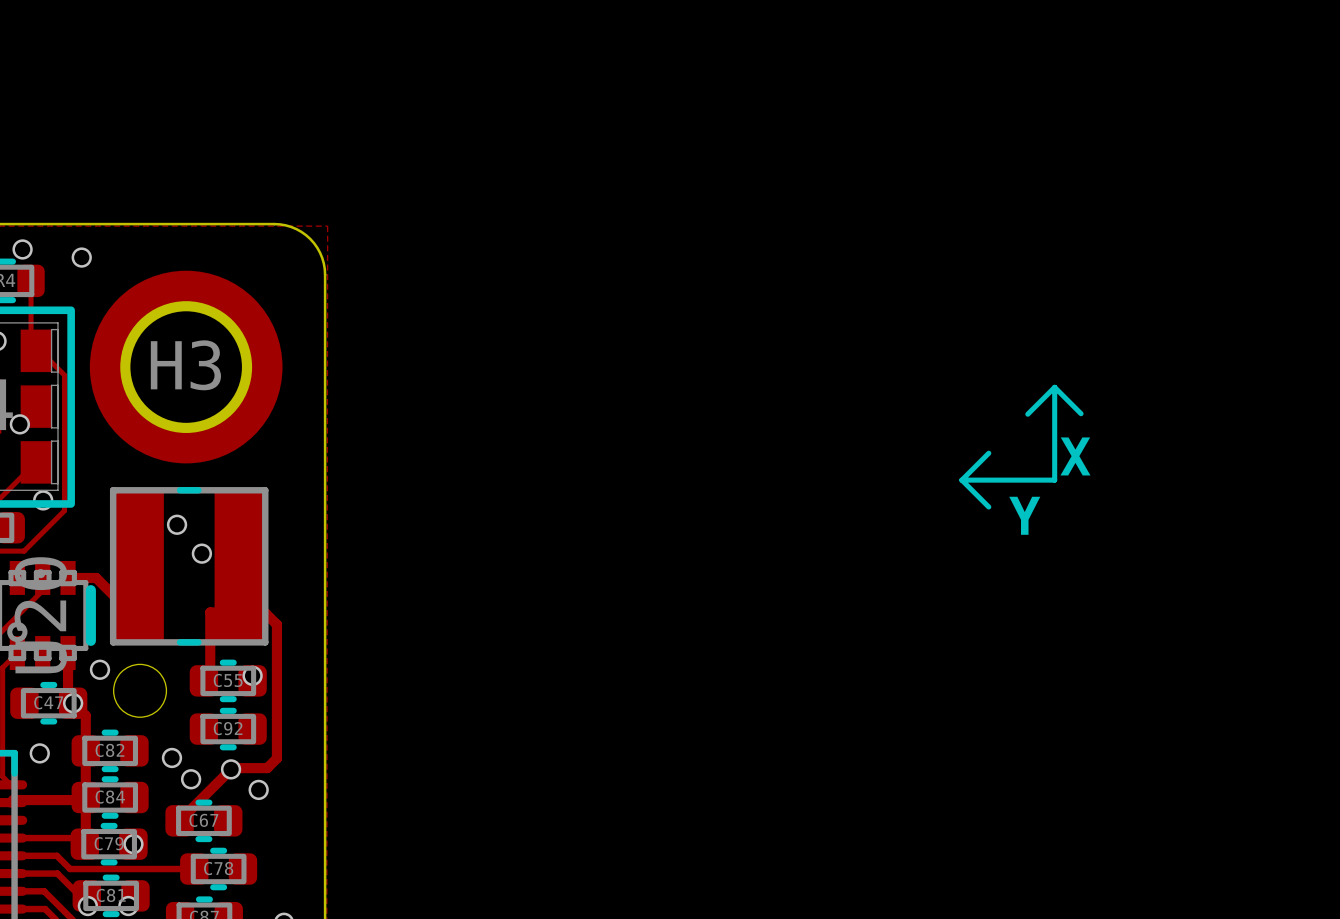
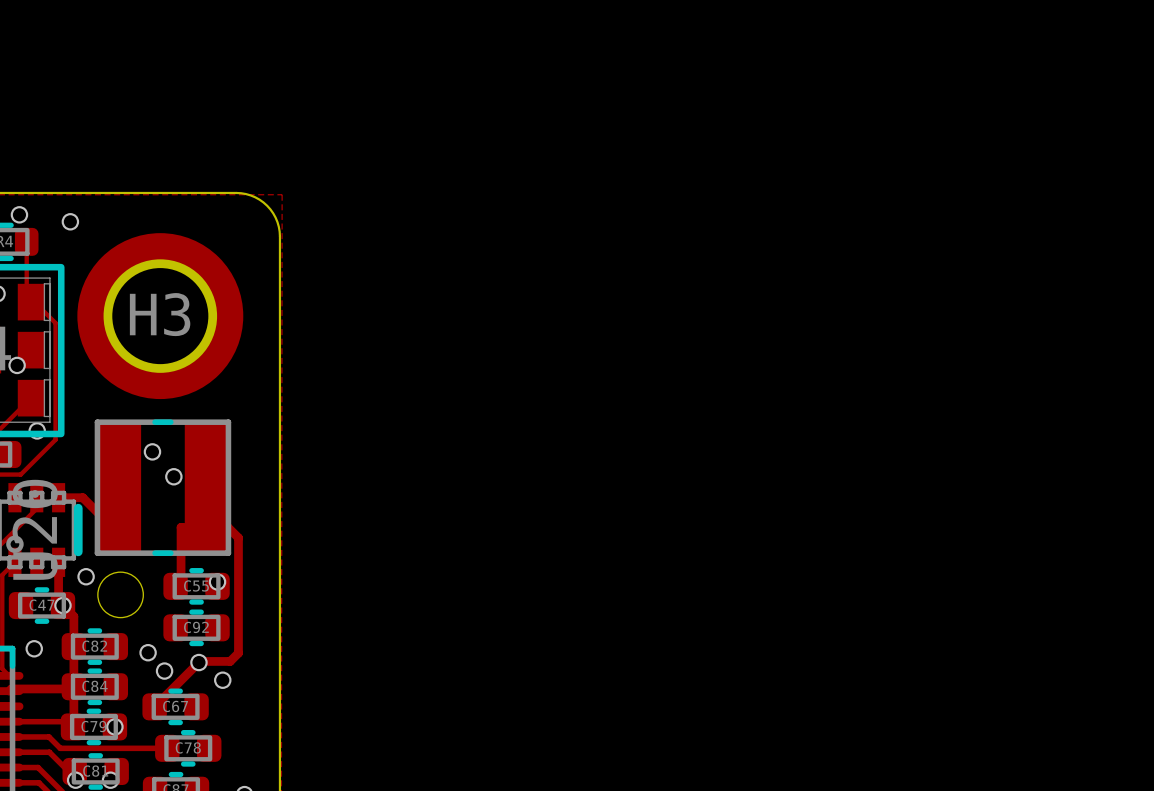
line: (1054, 387) (1027, 414) -> none
line: (1054, 387) (1081, 413) -> none
line: (1054, 387) (1054, 480) (961, 480) -> none
line: (988, 453) (961, 480) -> none
text: X (1075, 456) -> none
line: (961, 480) (988, 507) -> none
text: Y (1024, 515) -> none

